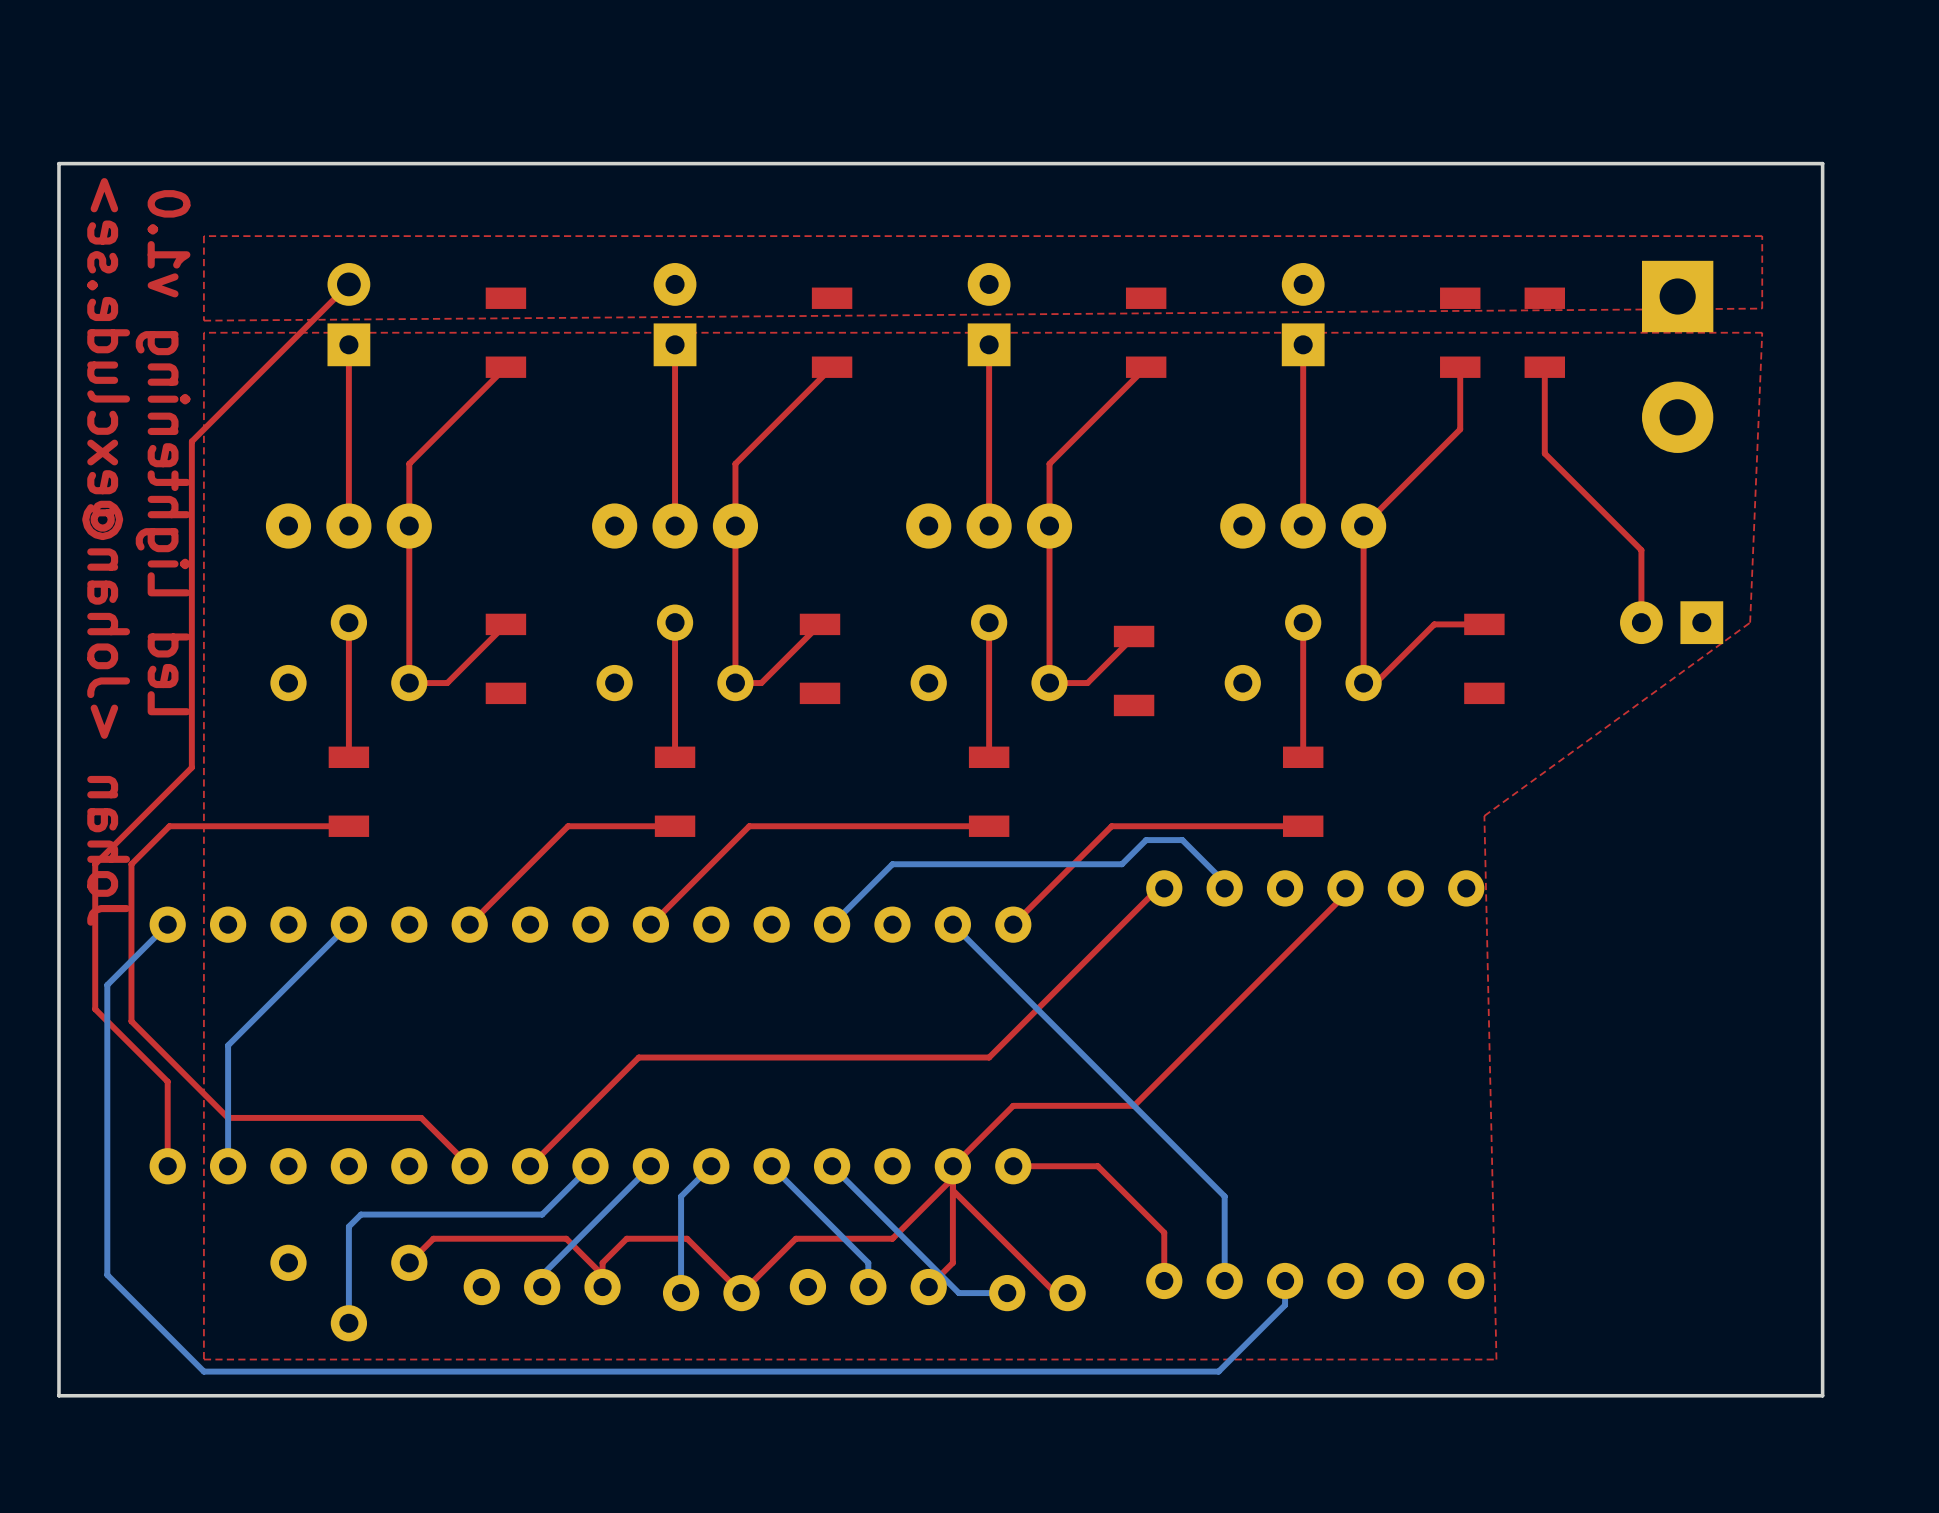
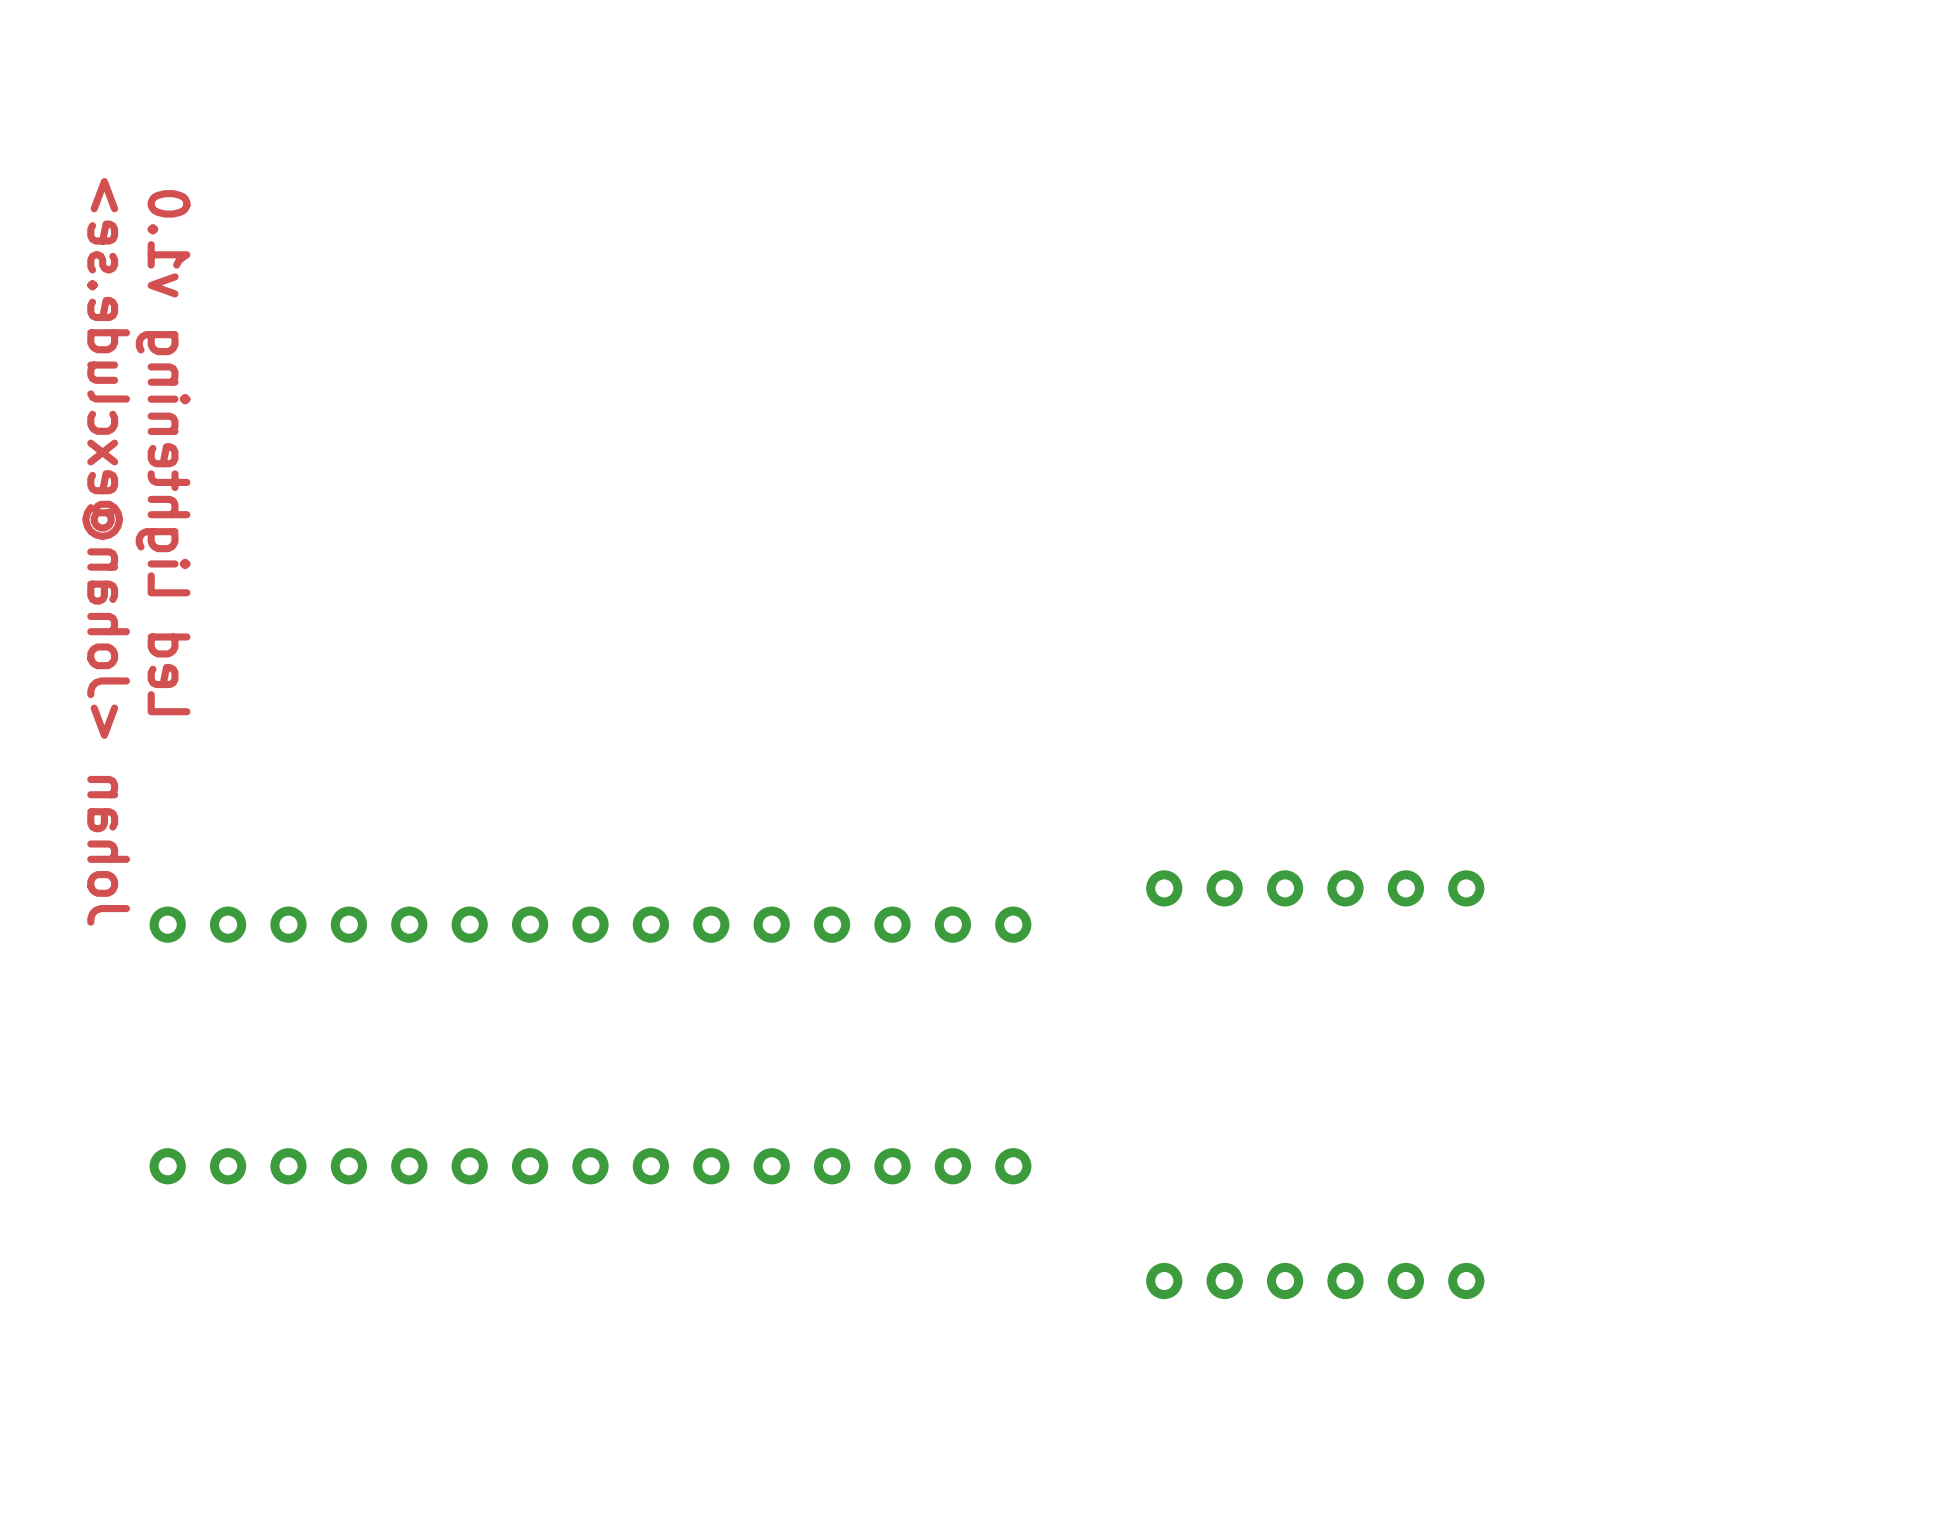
board edge: (1822, 163) (1822, 1395) (58, 1395) (58, 163) (1822, 163) -> none
top zone outline: (1762, 236) (203, 236) (203, 320) (1762, 308) (1762, 236) -> none
top track: (348, 284) (191, 441) (191, 767) (95, 864) (95, 1009) (167, 1081) (167, 1166) -> none
part: (348, 314) -> none
part: (675, 314) -> none
part: (989, 314) -> none
part: (1303, 314) -> none
part: (505, 332) -> none
part: (832, 332) -> none
part: (1146, 332) -> none
part: (1460, 332) -> none
part: (1544, 332) -> none
top zone outline: (1762, 332) (203, 332) (203, 1359) (1496, 1359) (1484, 815) (1750, 622) (1762, 332) -> none
top track: (348, 344) (348, 526) -> none
top track: (675, 344) (675, 526) -> none
top track: (989, 344) (989, 526) -> none
top track: (1303, 344) (1303, 526) -> none
part: (1677, 356) -> none
top track: (505, 367) (409, 463) (409, 683) (447, 683) (505, 624) -> none
top track: (832, 367) (735, 463) (735, 683) (761, 683) (820, 624) -> none
top track: (1146, 367) (1049, 463) (1049, 683) (1087, 683) (1134, 636) -> none
top track: (1460, 367) (1460, 429) (1363, 526) (1363, 683) (1375, 683) (1434, 624) (1484, 624) -> none
top track: (1544, 367) (1544, 453) (1641, 550) (1641, 622) -> none
part: (348, 526) -> none
part: (675, 526) -> none
part: (989, 526) -> none
part: (1303, 526) -> none
top track: (348, 622) (348, 757) -> none
top track: (675, 622) (675, 757) -> none
top track: (989, 622) (989, 757) -> none
top track: (1303, 622) (1303, 757) -> none
part: (1671, 622) -> none
part: (348, 652) -> none
part: (675, 652) -> none
part: (989, 652) -> none
part: (1303, 652) -> none
part: (505, 658) -> none
part: (820, 658) -> none
part: (1484, 658) -> none
part: (1134, 670) -> none
part: (348, 791) -> none
part: (675, 791) -> none
part: (989, 791) -> none
part: (1303, 791) -> none
top track: (348, 826) (169, 826) (131, 864) (131, 1021) (228, 1117) (421, 1117) (469, 1166) -> none
top track: (675, 826) (568, 826) (469, 924) -> none
top track: (989, 826) (749, 826) (650, 924) -> none
top track: (1303, 826) (1111, 826) (1013, 924) -> none
top track: (1164, 888) (1158, 888) (989, 1057) (638, 1057) (530, 1166) -> none
bottom track: (1224, 888) (1224, 882) (1182, 840) (1146, 840) (1122, 864) (892, 864) (832, 924) -> none
top track: (1345, 888) (1345, 894) (1134, 1105) (1013, 1105) (952, 1166) (952, 1262) (928, 1287) (928, 1299) -> none
bottom track: (167, 924) (107, 985) (107, 1274) (203, 1371) (1218, 1371) (1285, 1305) (1285, 1281) -> none
bottom track: (348, 924) (228, 1045) (228, 1166) -> none
bottom track: (952, 924) (1224, 1196) (1224, 1281) -> none
bottom track: (590, 1166) (542, 1214) (360, 1214) (348, 1226) (348, 1323) -> none
bottom track: (650, 1166) (542, 1274) (542, 1287) -> none
bottom track: (711, 1166) (681, 1196) (681, 1293) -> none
bottom track: (771, 1166) (868, 1262) (868, 1287) -> none
bottom track: (832, 1166) (958, 1293) (995, 1293) -> none
top track: (1013, 1166) (1097, 1166) (1164, 1232) (1164, 1281) -> none
top track: (952, 1178) (892, 1238) (795, 1238) (741, 1293) (687, 1238) (626, 1238) (602, 1262) (602, 1287) -> none
top track: (952, 1190) (1055, 1293) -> none
top track: (409, 1262) (433, 1238) (566, 1238) (602, 1274) -> none
part: (542, 1287) -> none
part: (868, 1287) -> none
part: (348, 1293) -> none
part: (711, 1293) -> none
part: (1037, 1293) -> none

